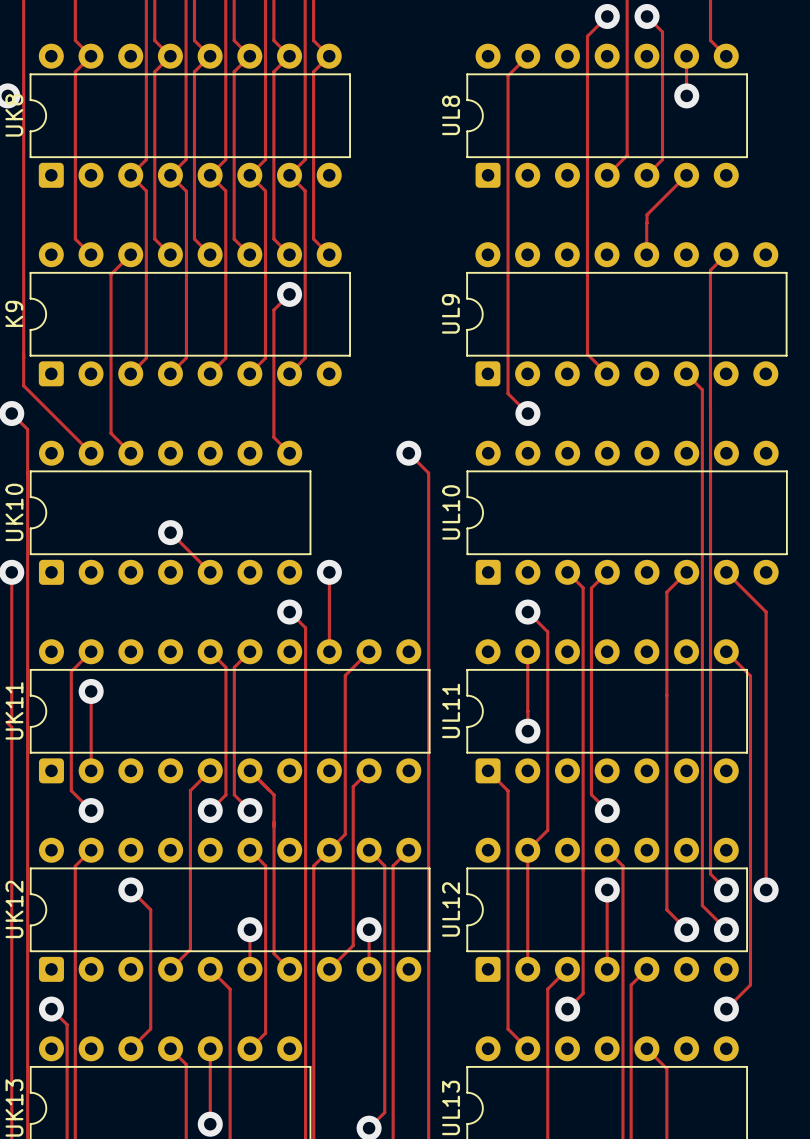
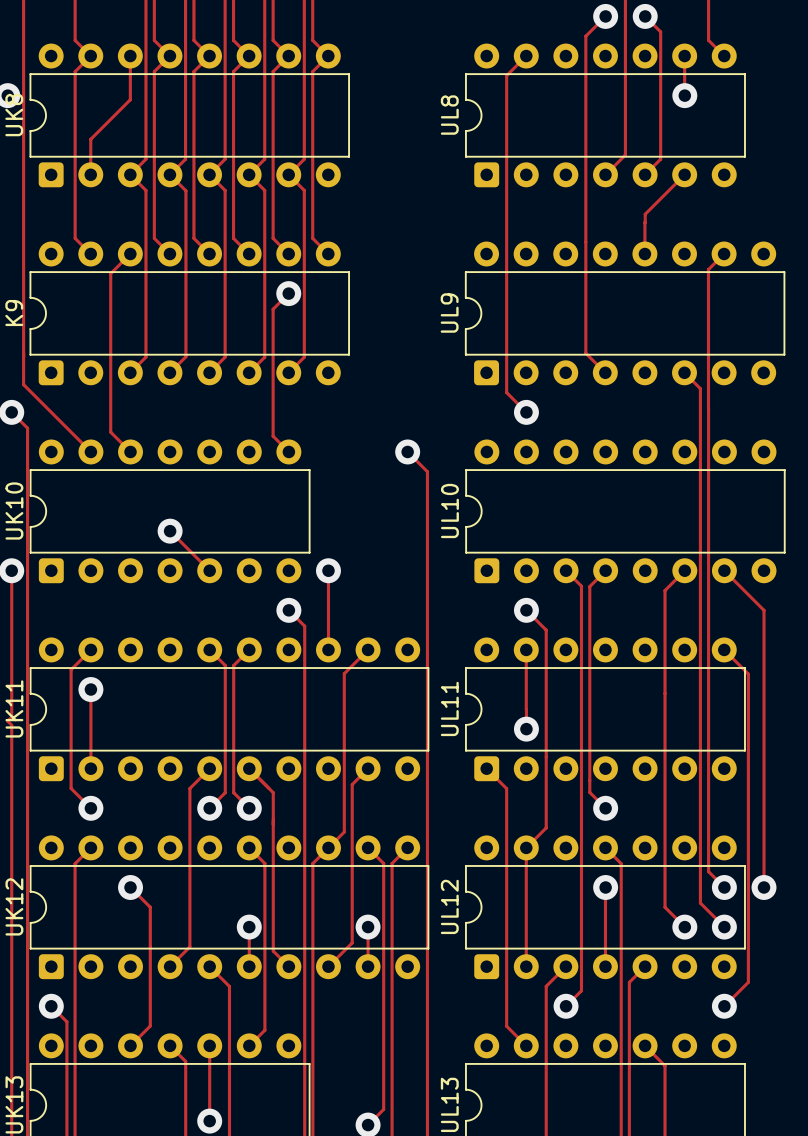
track: none -> (130, 56) (130, 99) (90, 139) (90, 174)

